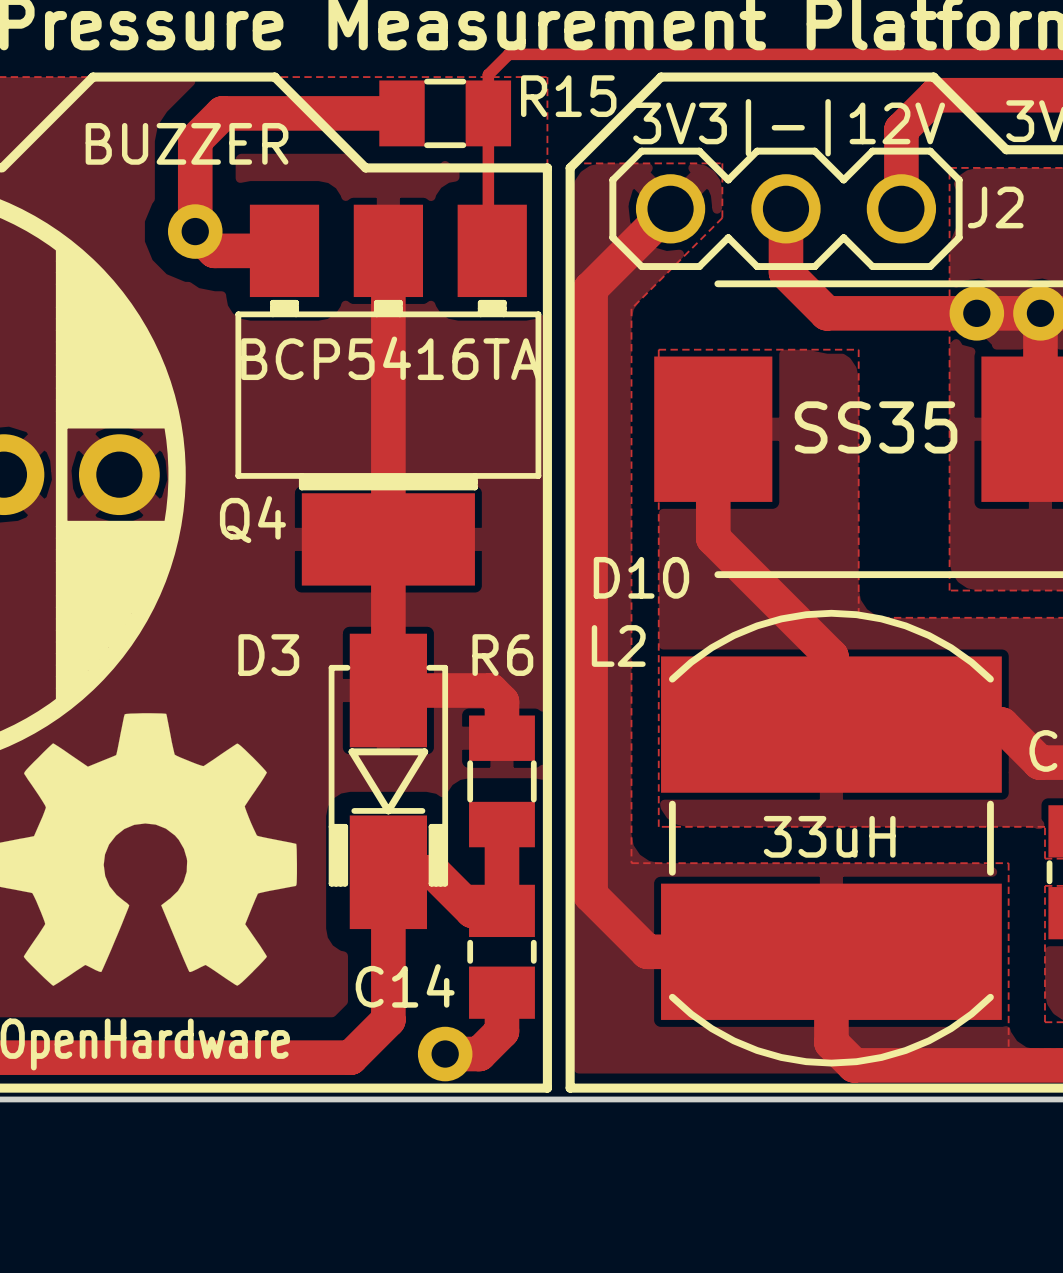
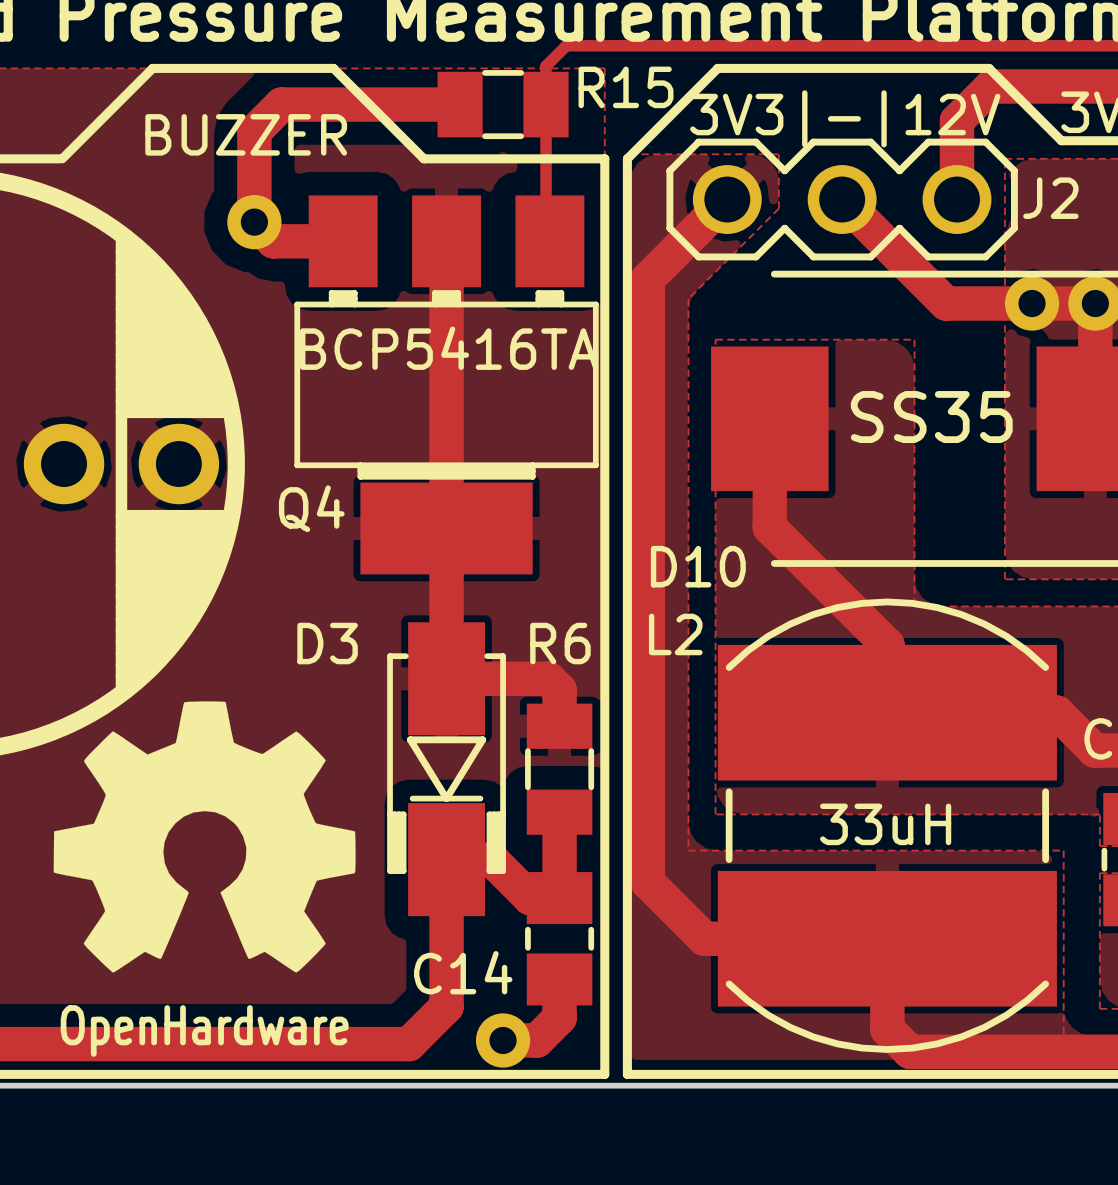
track: (785, 208) (785, 272) (826, 313) (890, 313) -> (842, 199) (946, 303)

